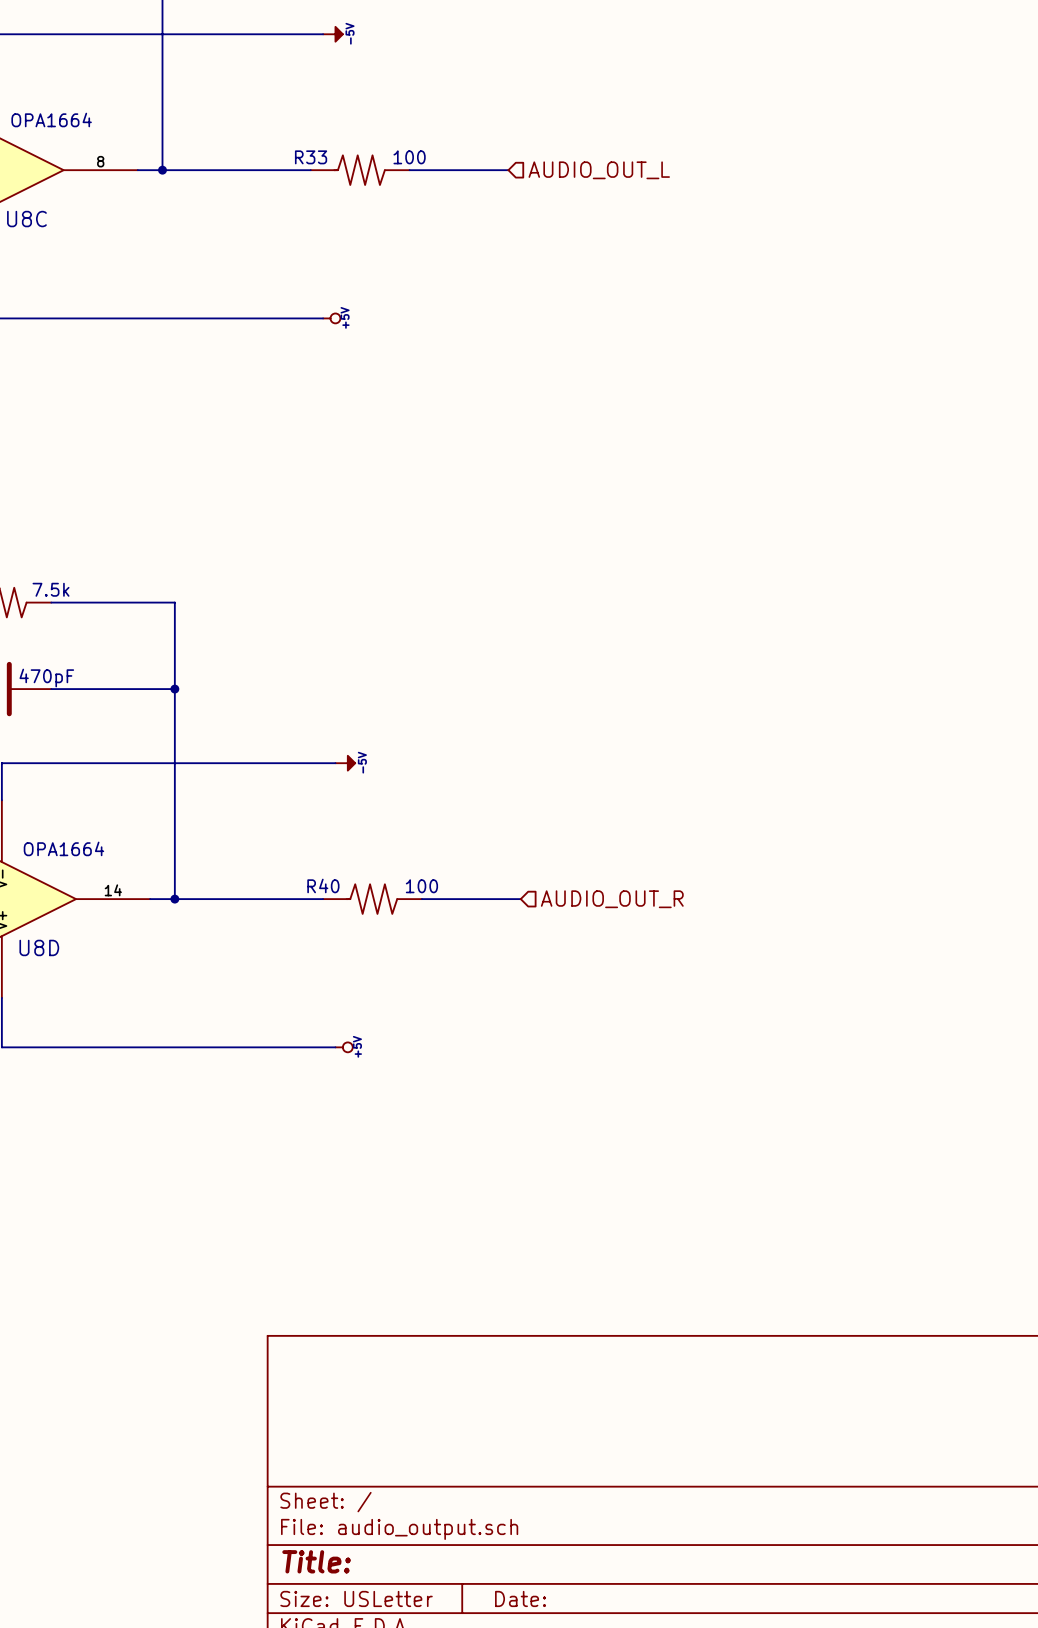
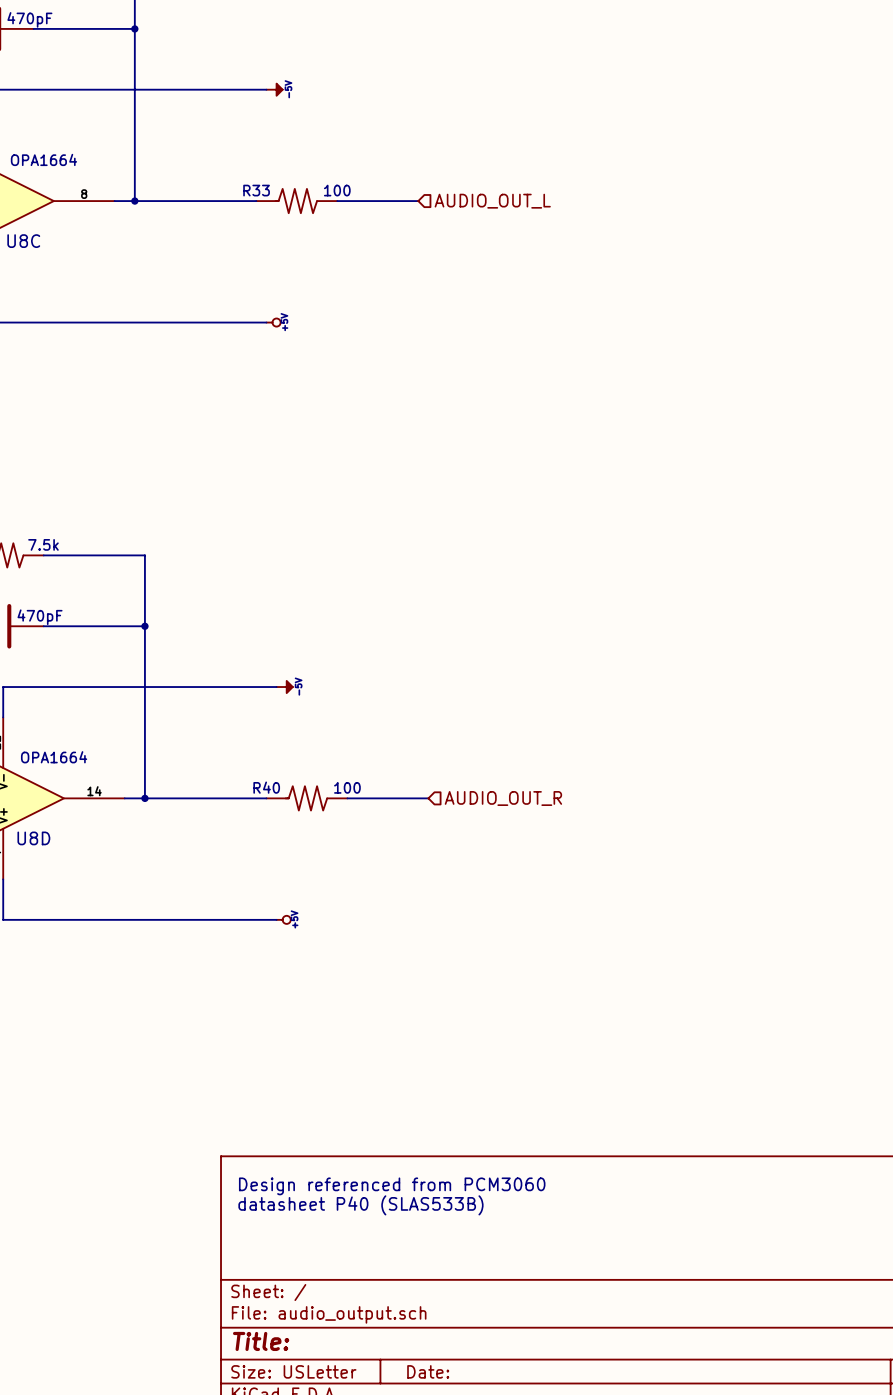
text: none -> Design referenced from PCM3060 (392, 1186)
text: none -> datasheet P40 (SLAS533B) (360, 1205)

